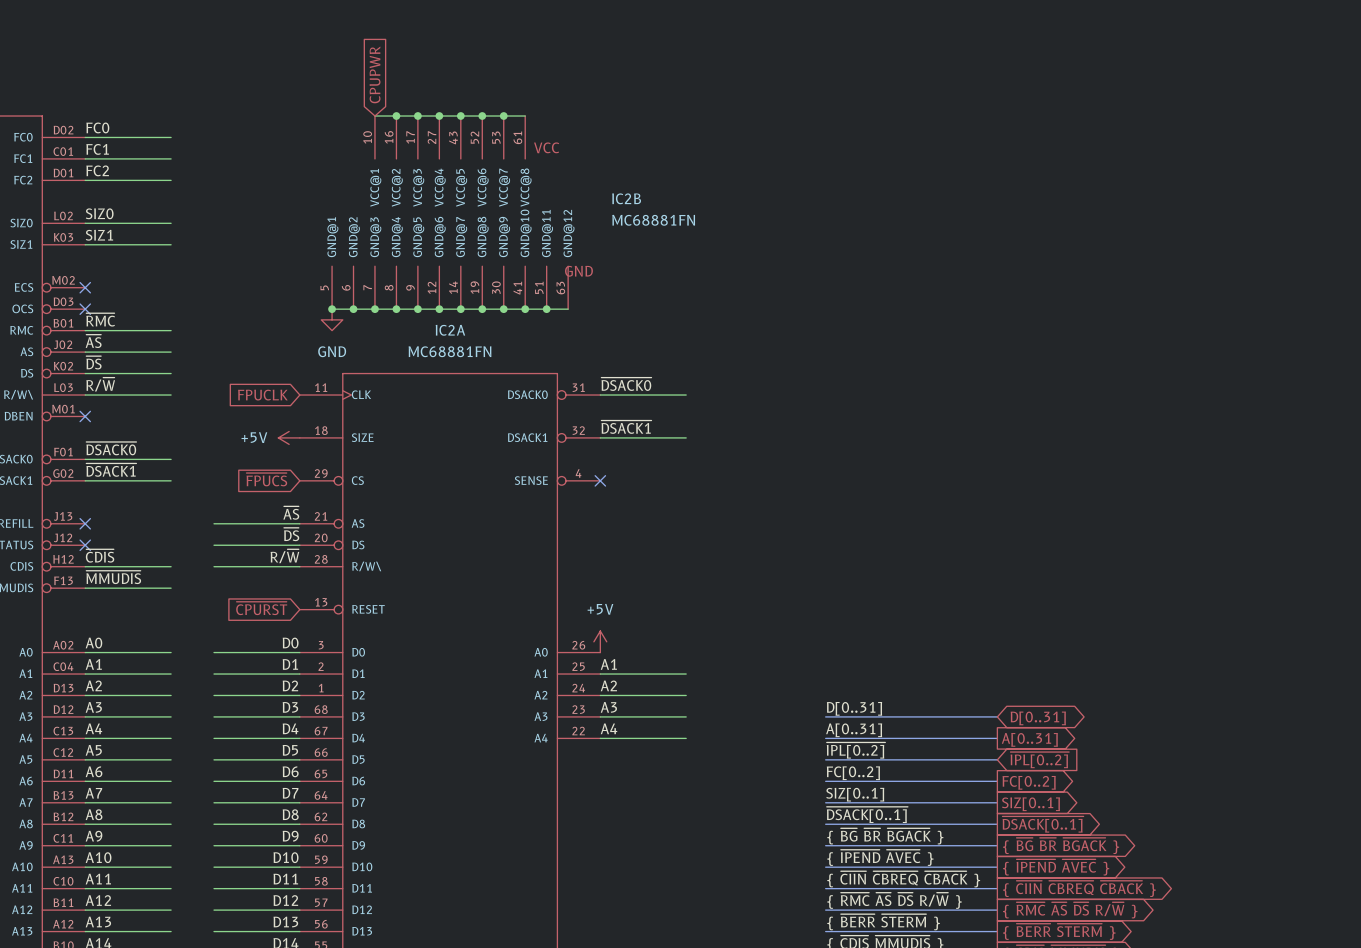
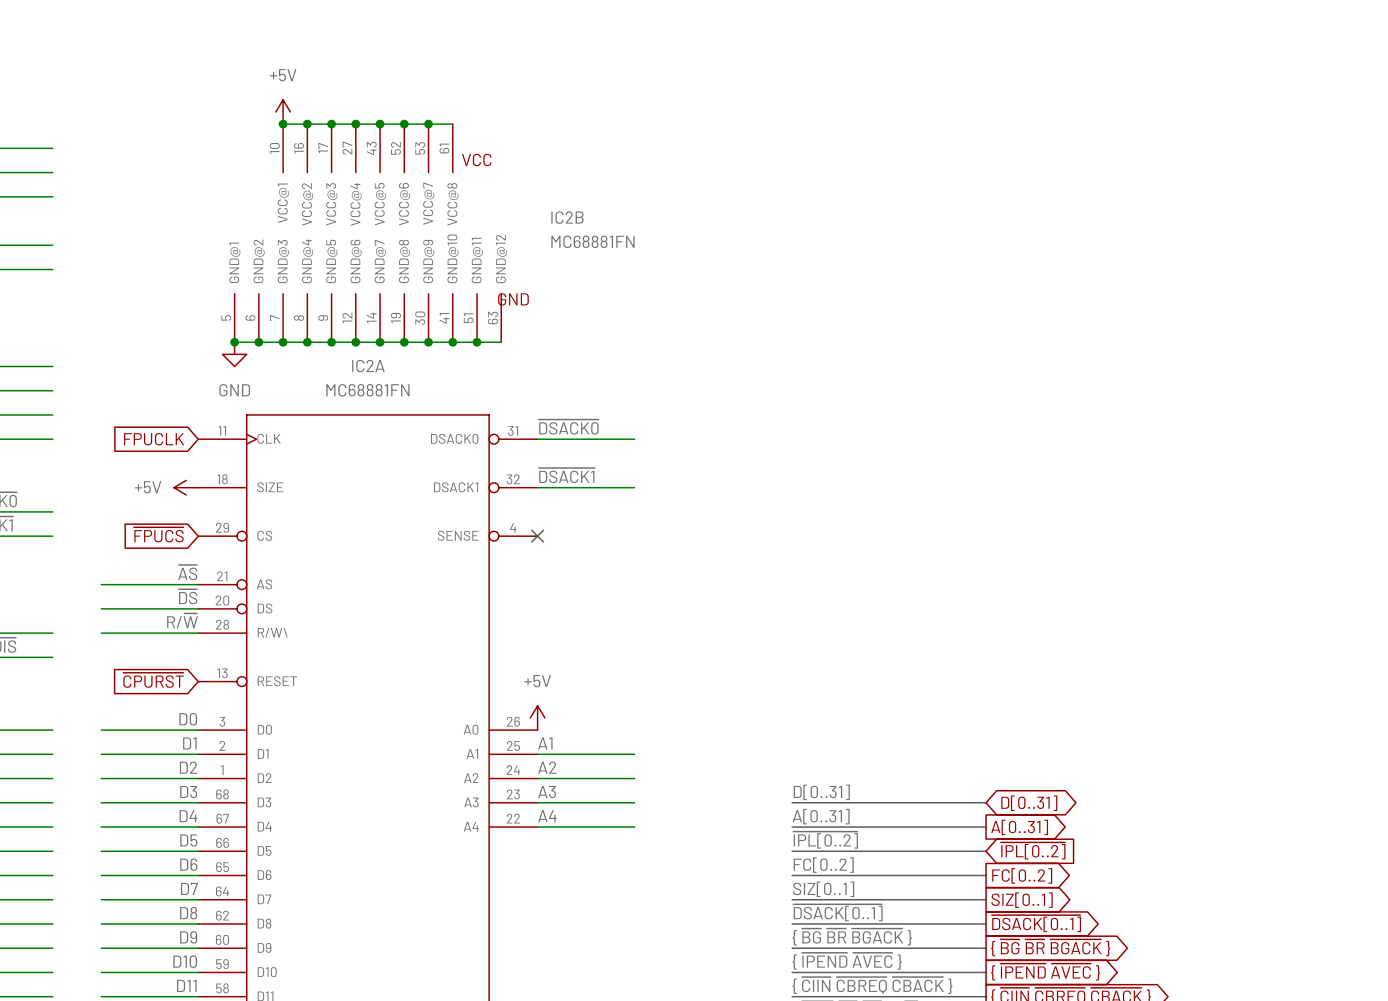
global label: CPUPWR (375, 74) -> none
power symbol: none -> +5V (283, 111)
junction: none -> (283, 124)

